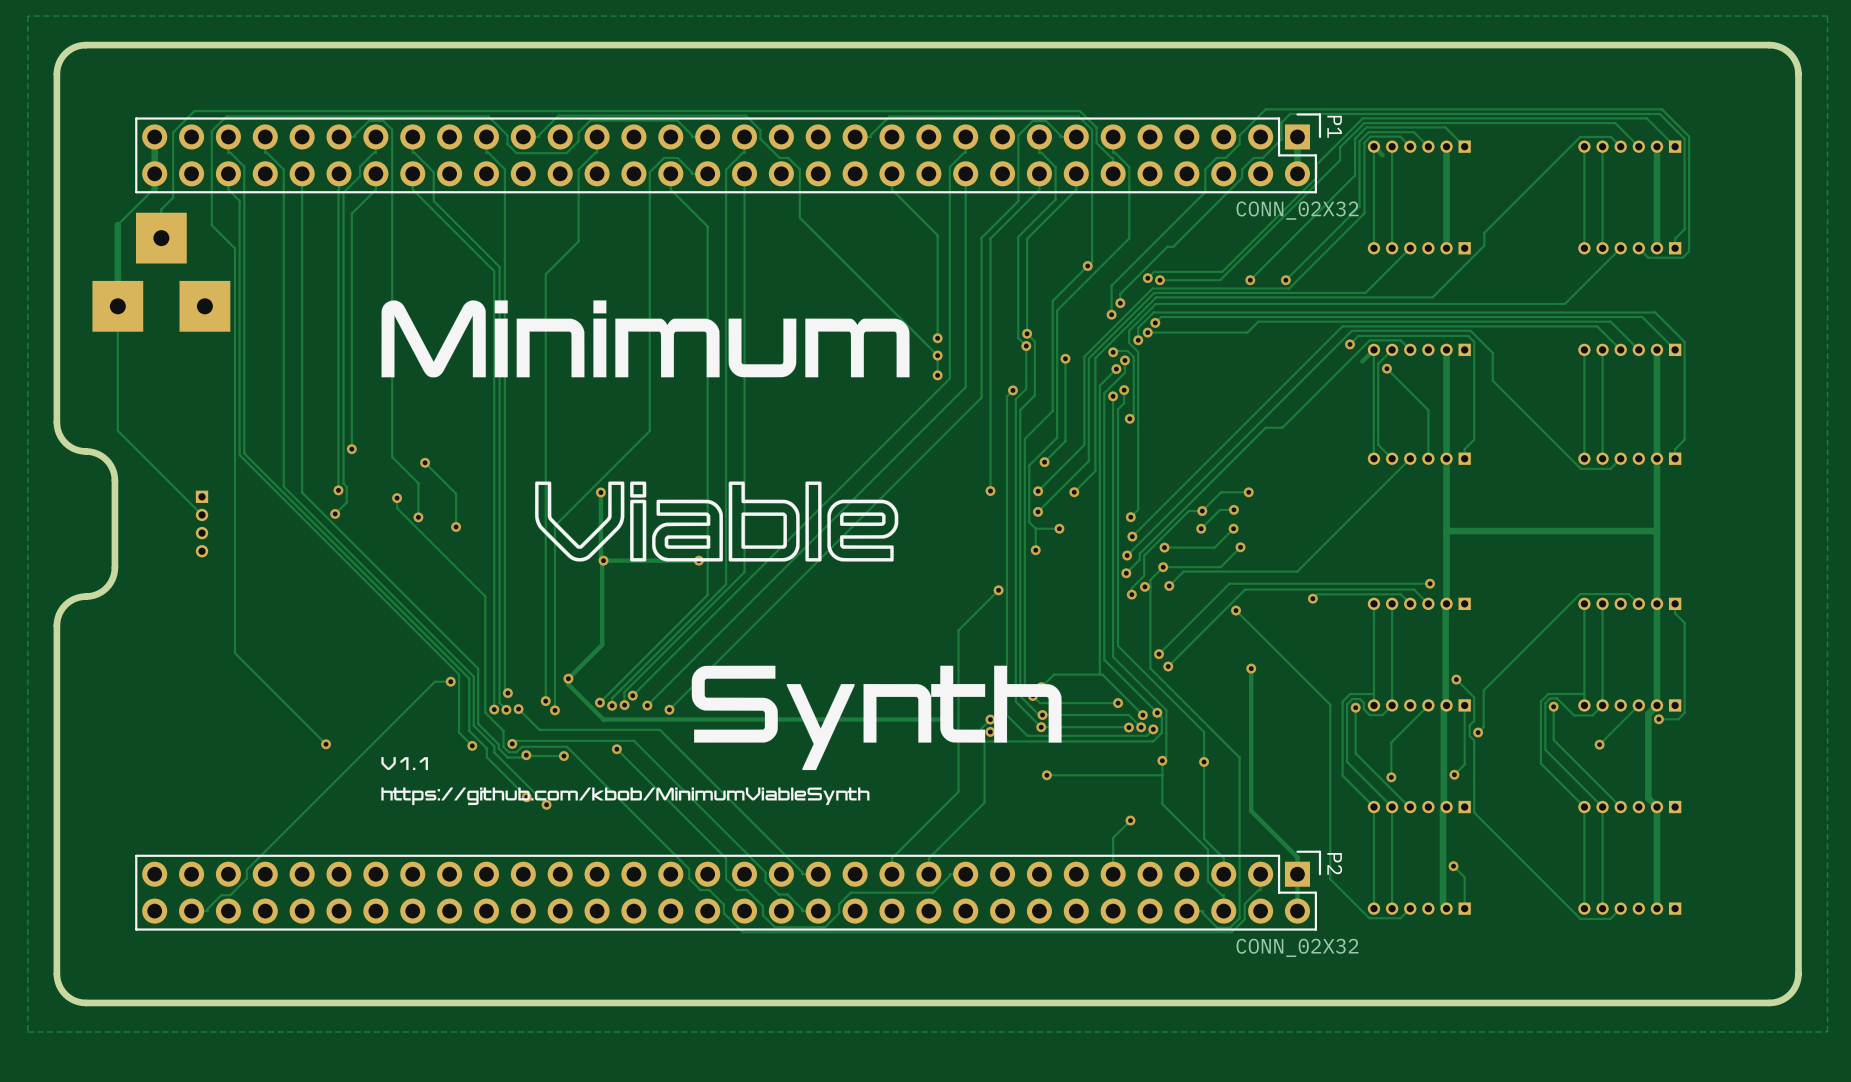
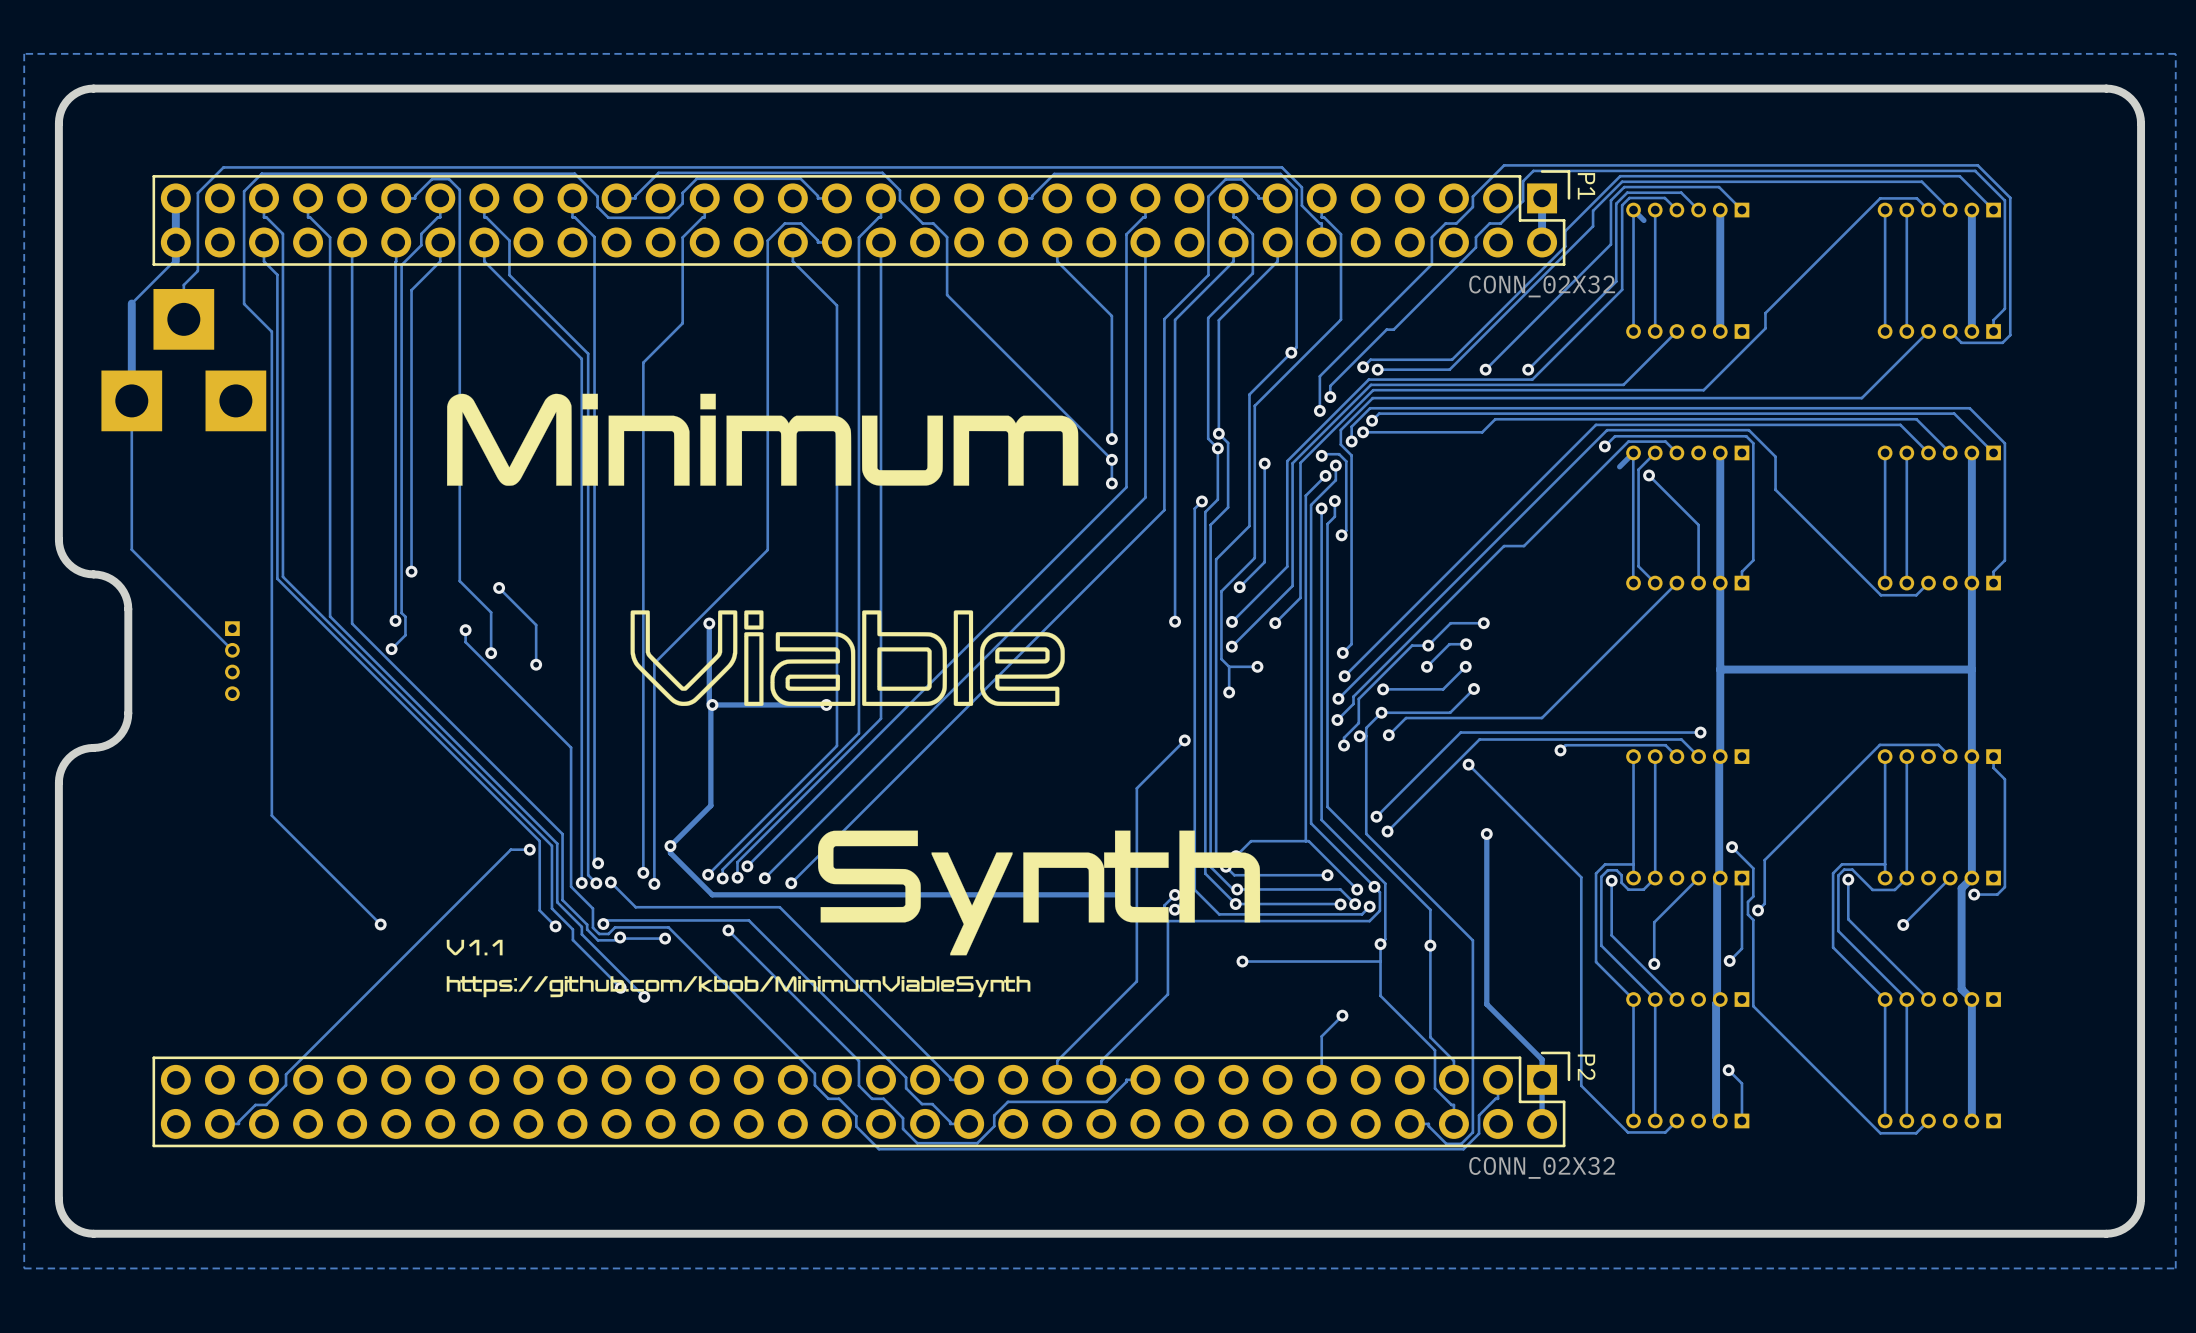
part footprint: [92, 212, 231, 332] -> [101, 288, 267, 432]

